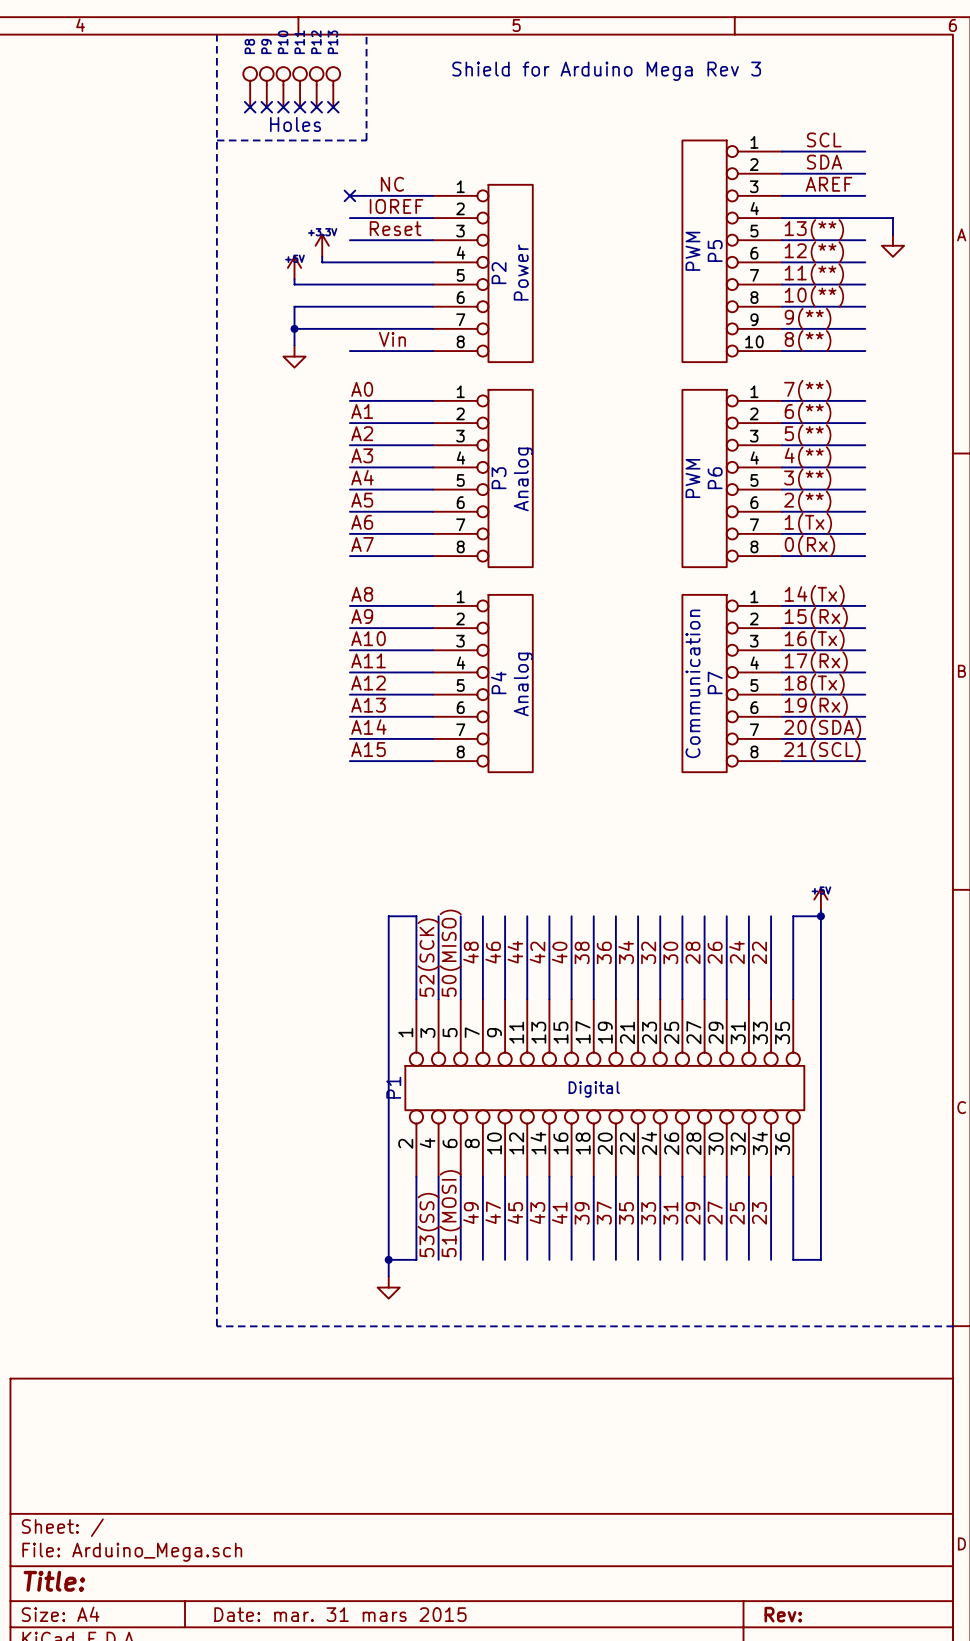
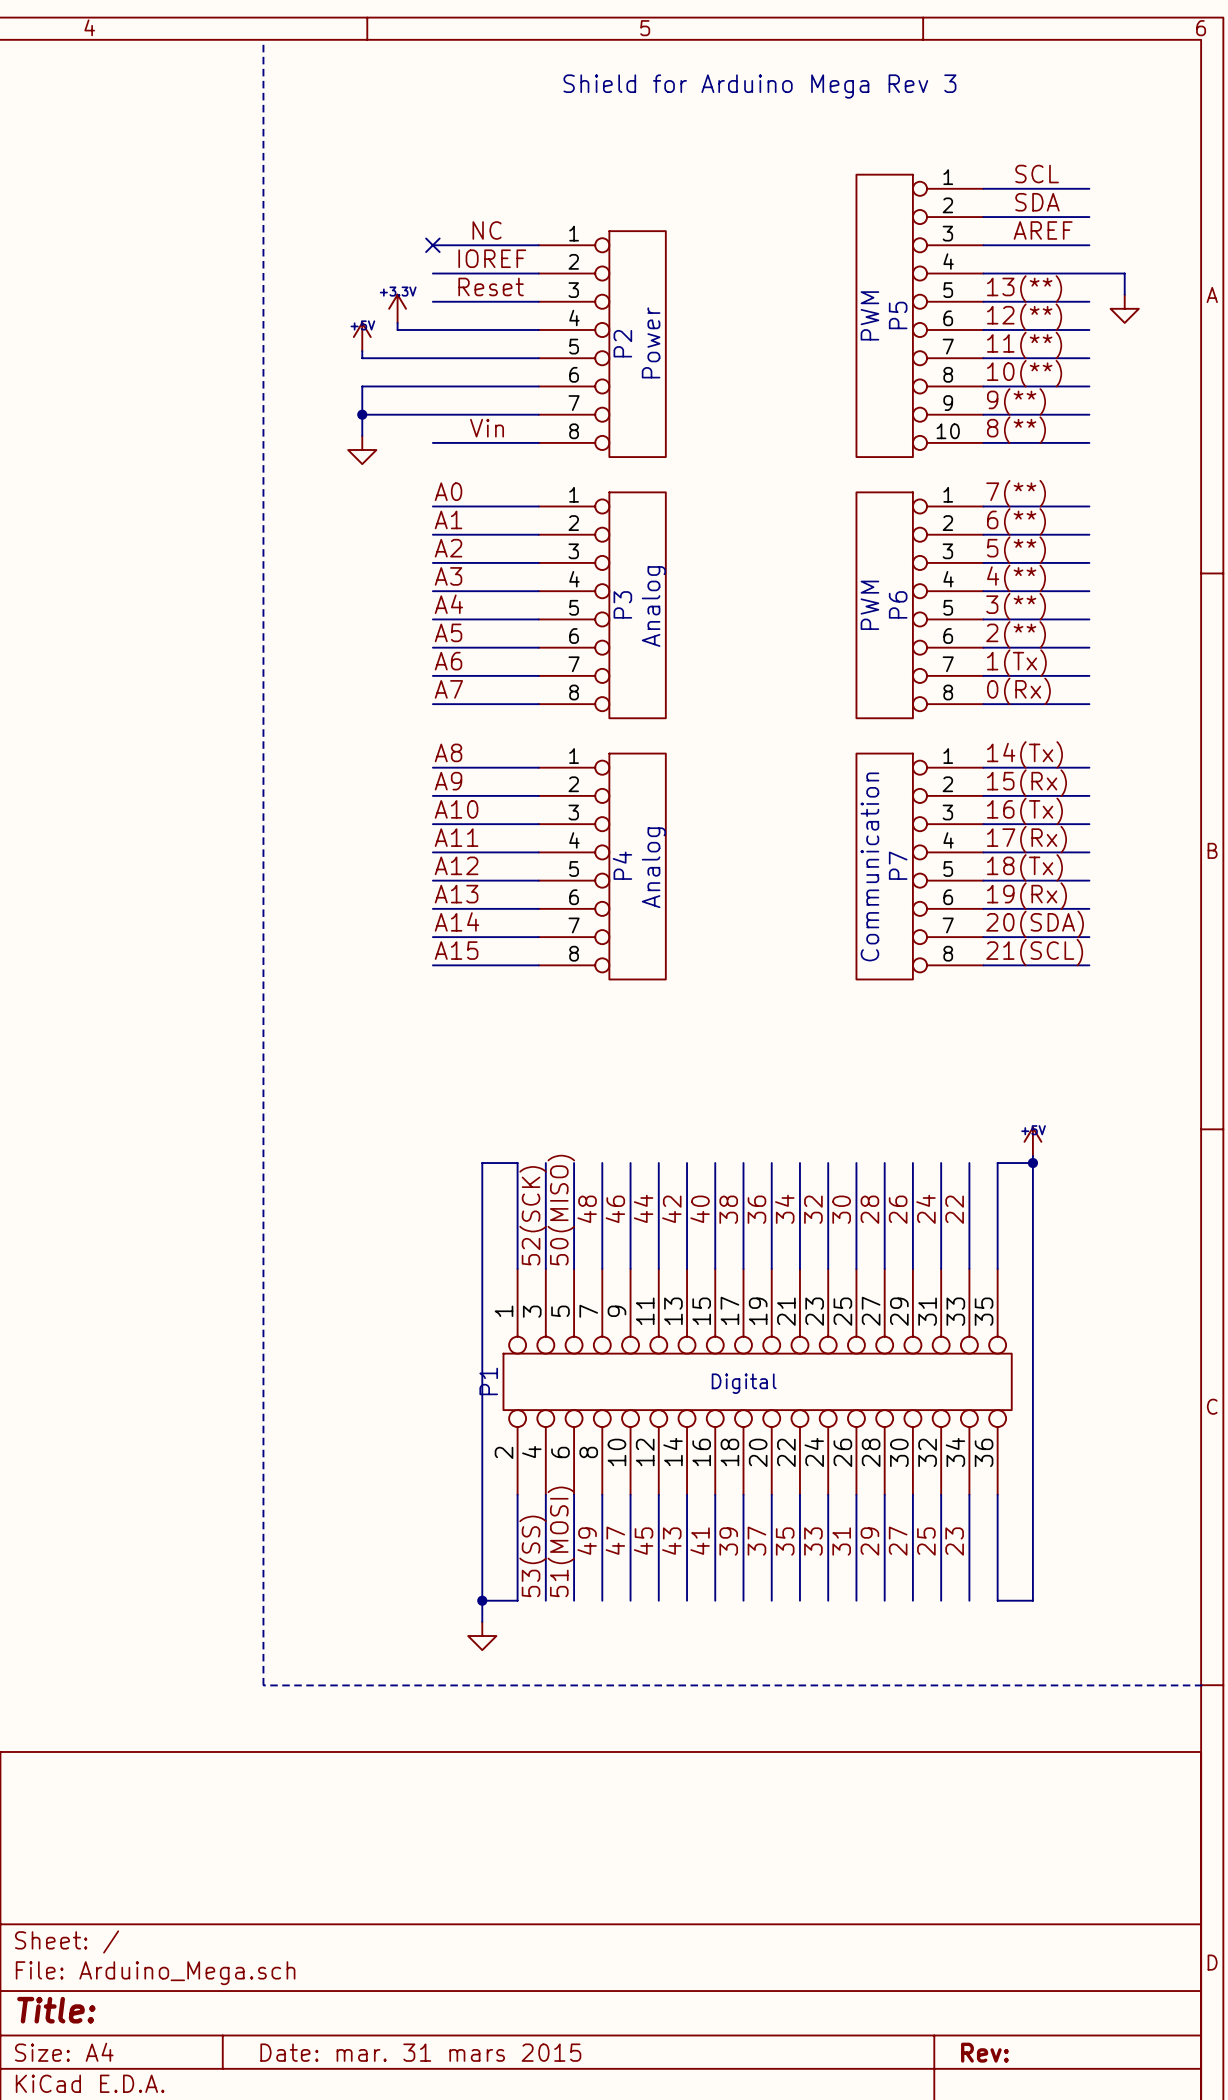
line: (366, 35) (366, 140) (216, 140) -> none
P8: (250, 87) -> none
P9: (266, 87) -> none
P10: (283, 87) -> none
P11: (300, 87) -> none
P12: (316, 87) -> none
P13: (333, 87) -> none
no-connect mark: (250, 107) -> none
no-connect mark: (266, 107) -> none
no-connect mark: (283, 107) -> none
no-connect mark: (300, 107) -> none
no-connect mark: (316, 107) -> none
no-connect mark: (333, 107) -> none
text: Holes (295, 124) -> none

